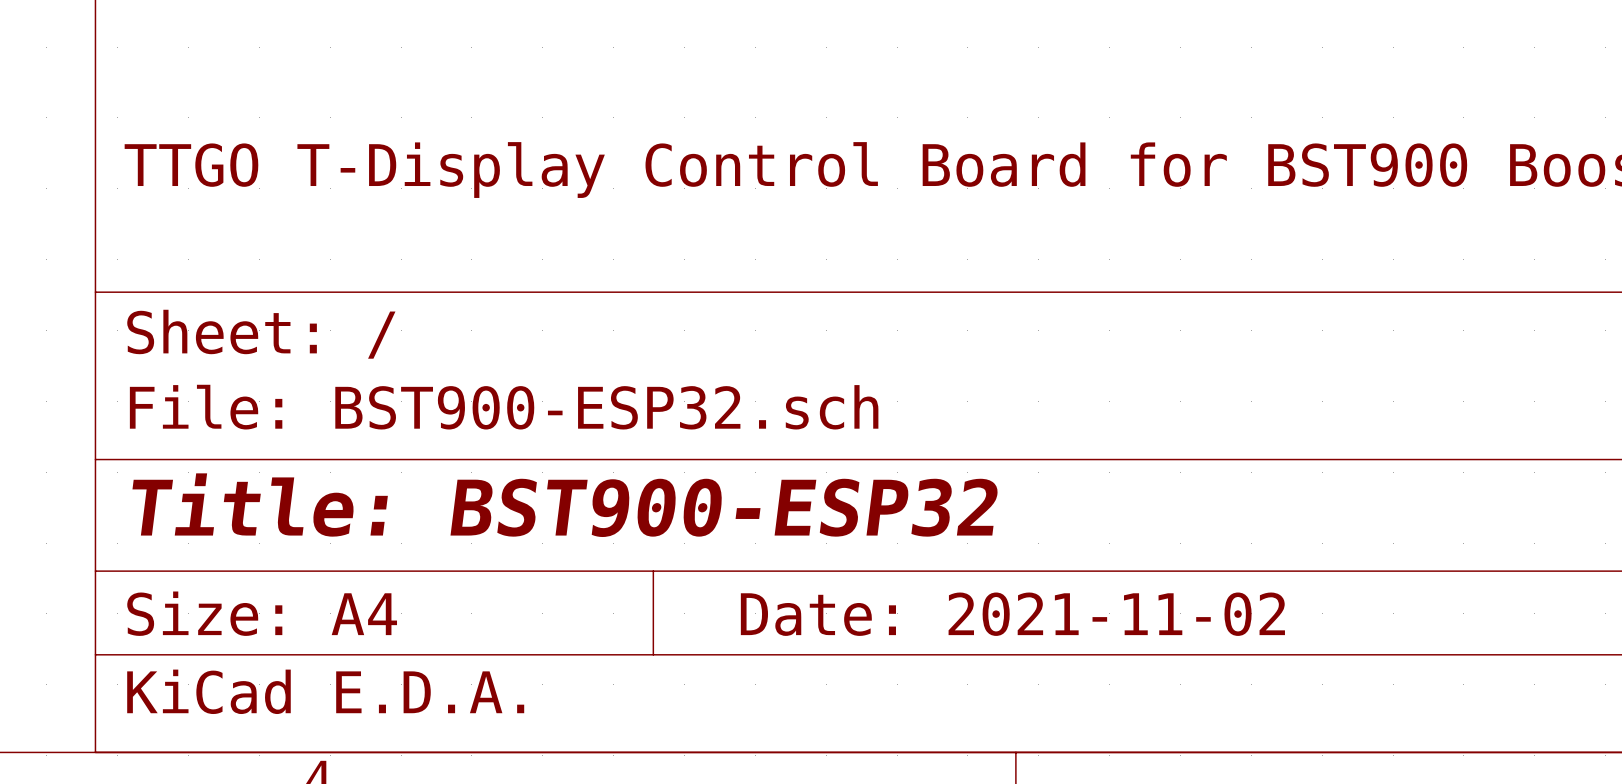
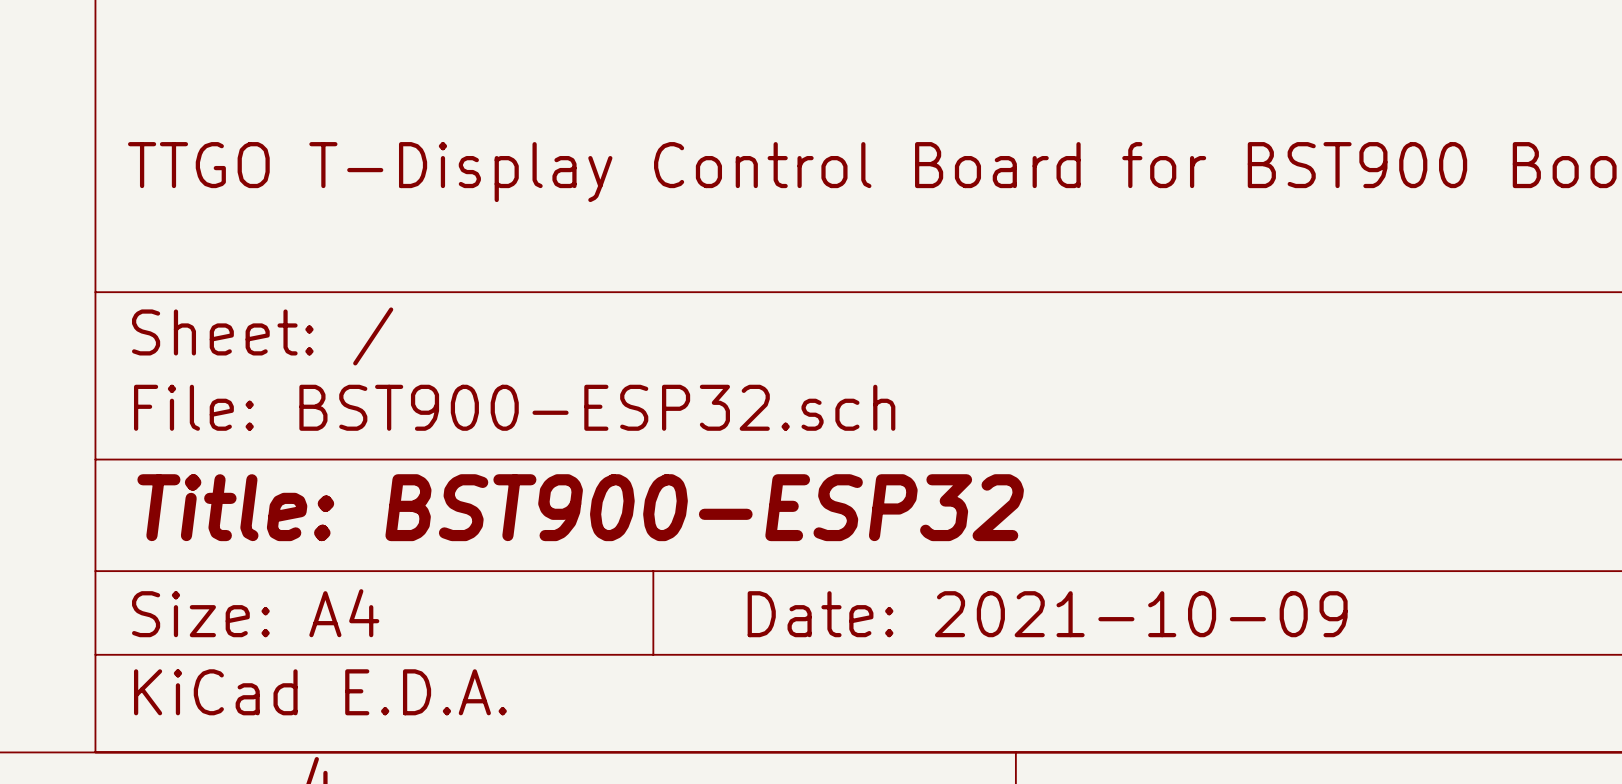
title block: Date: 2021-11-02 (1012, 614) -> Date: 2021-10-09 (1047, 614)

